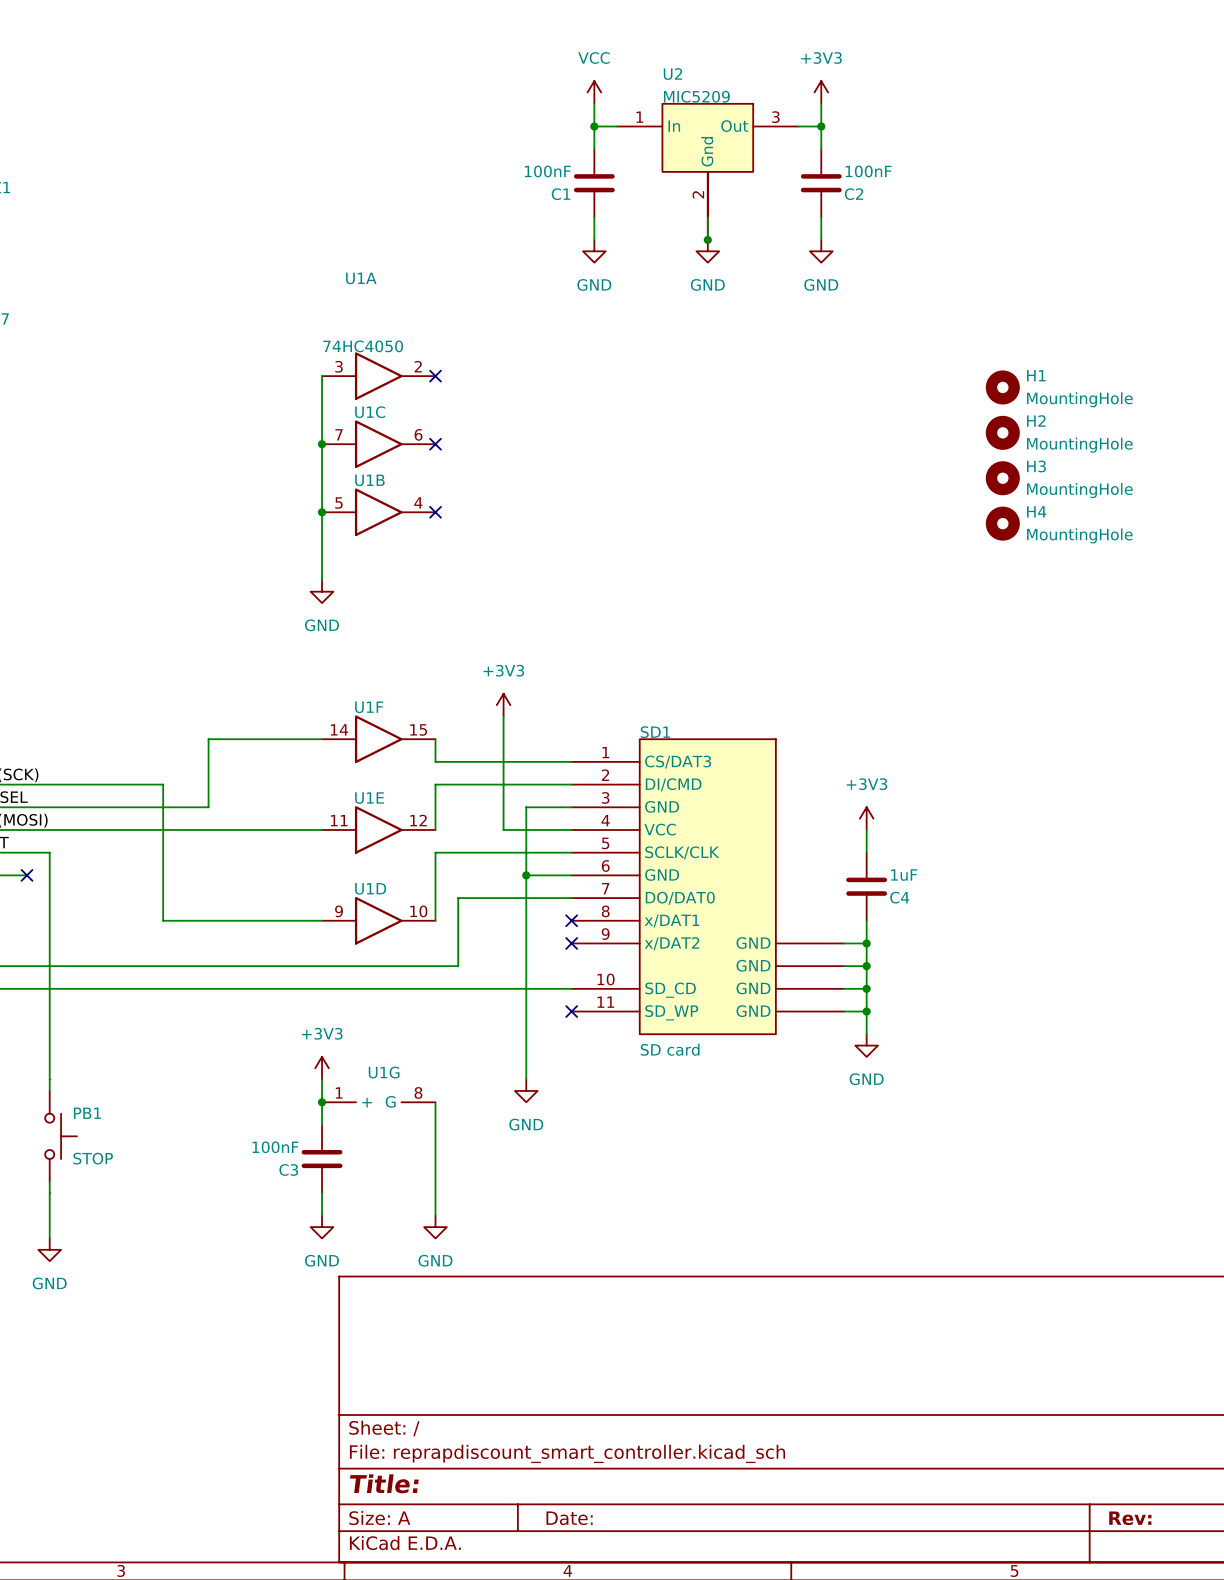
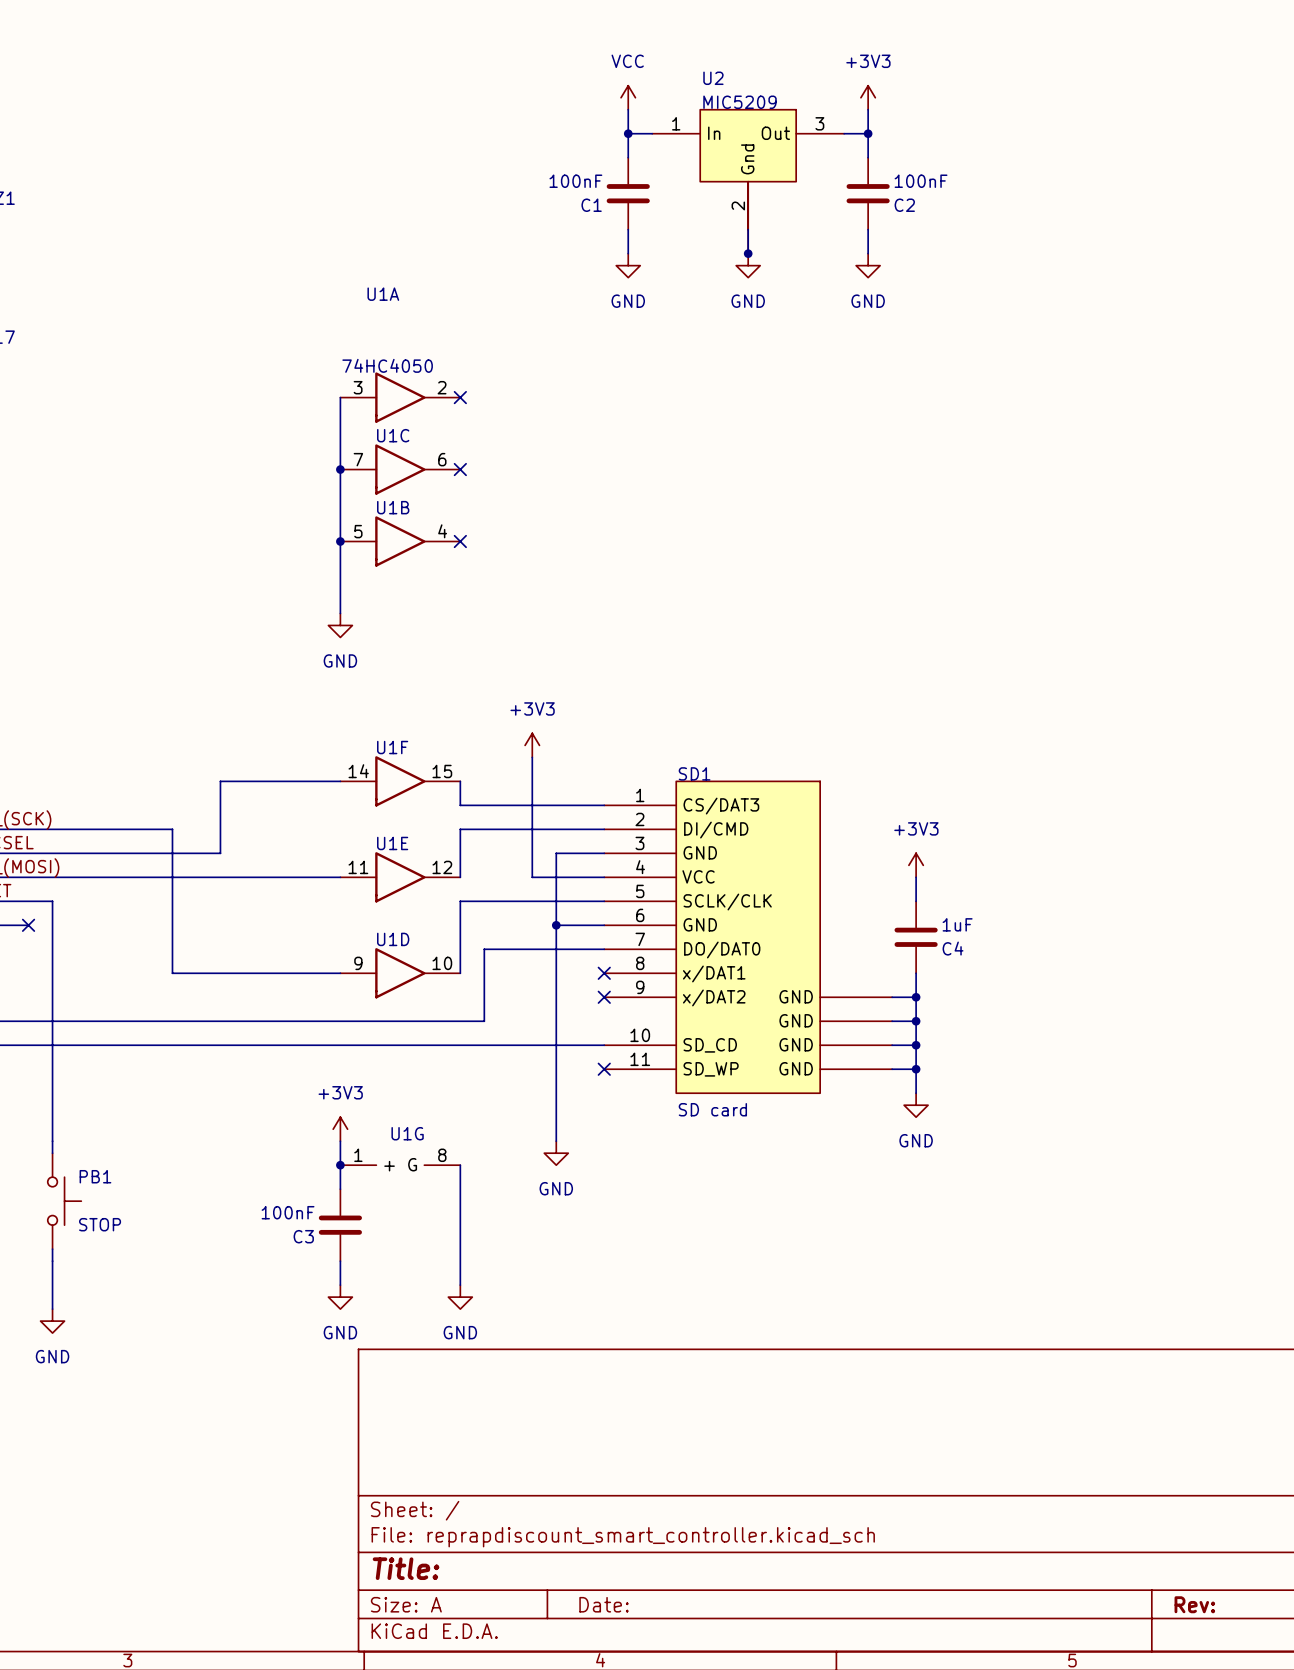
H1: MountingHole (1002, 387) -> none
H2: MountingHole (1002, 432) -> none
H3: MountingHole (1002, 478) -> none
H4: MountingHole (1002, 523) -> none

